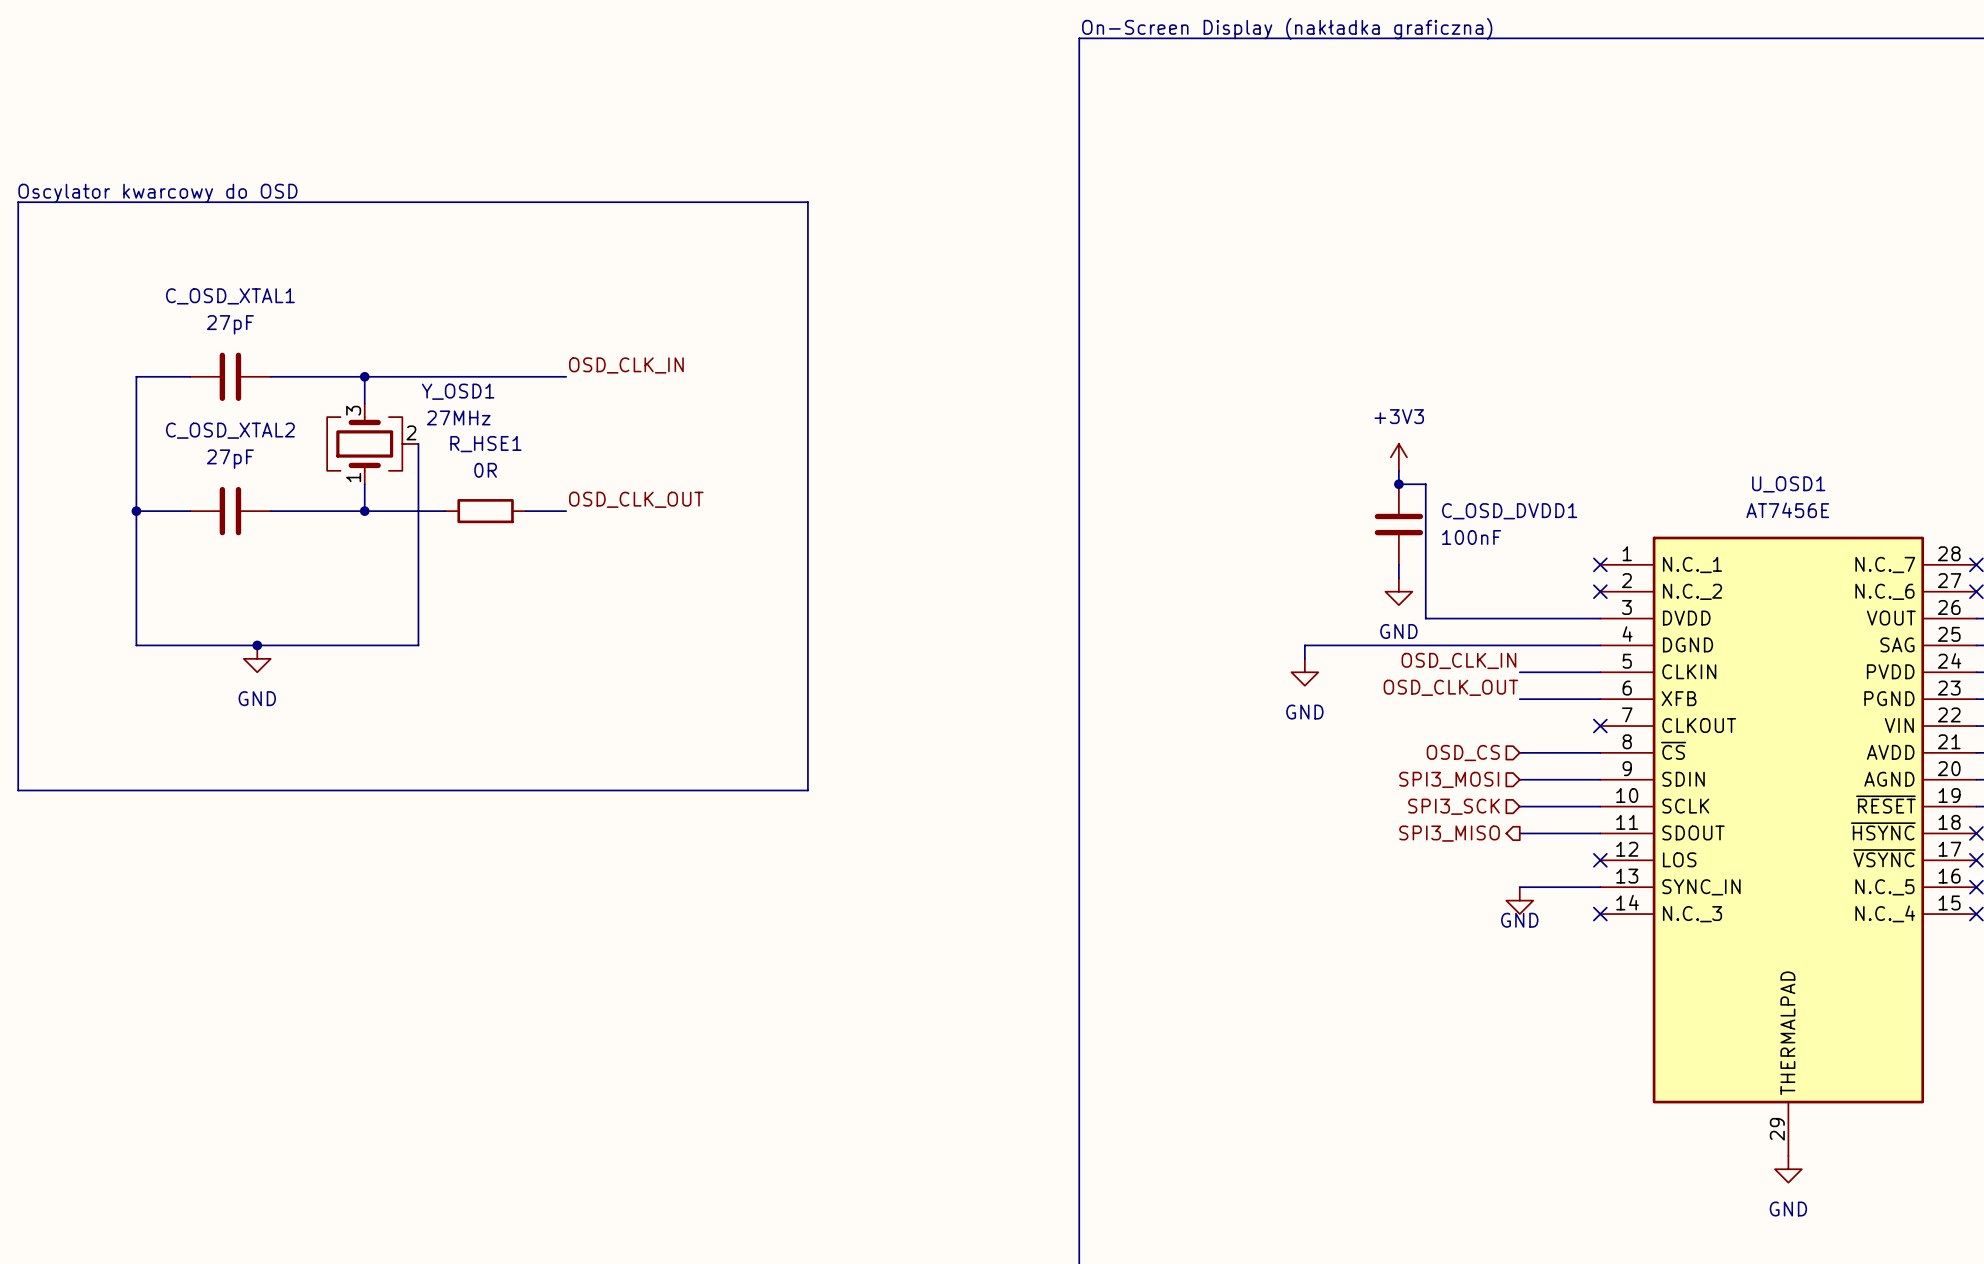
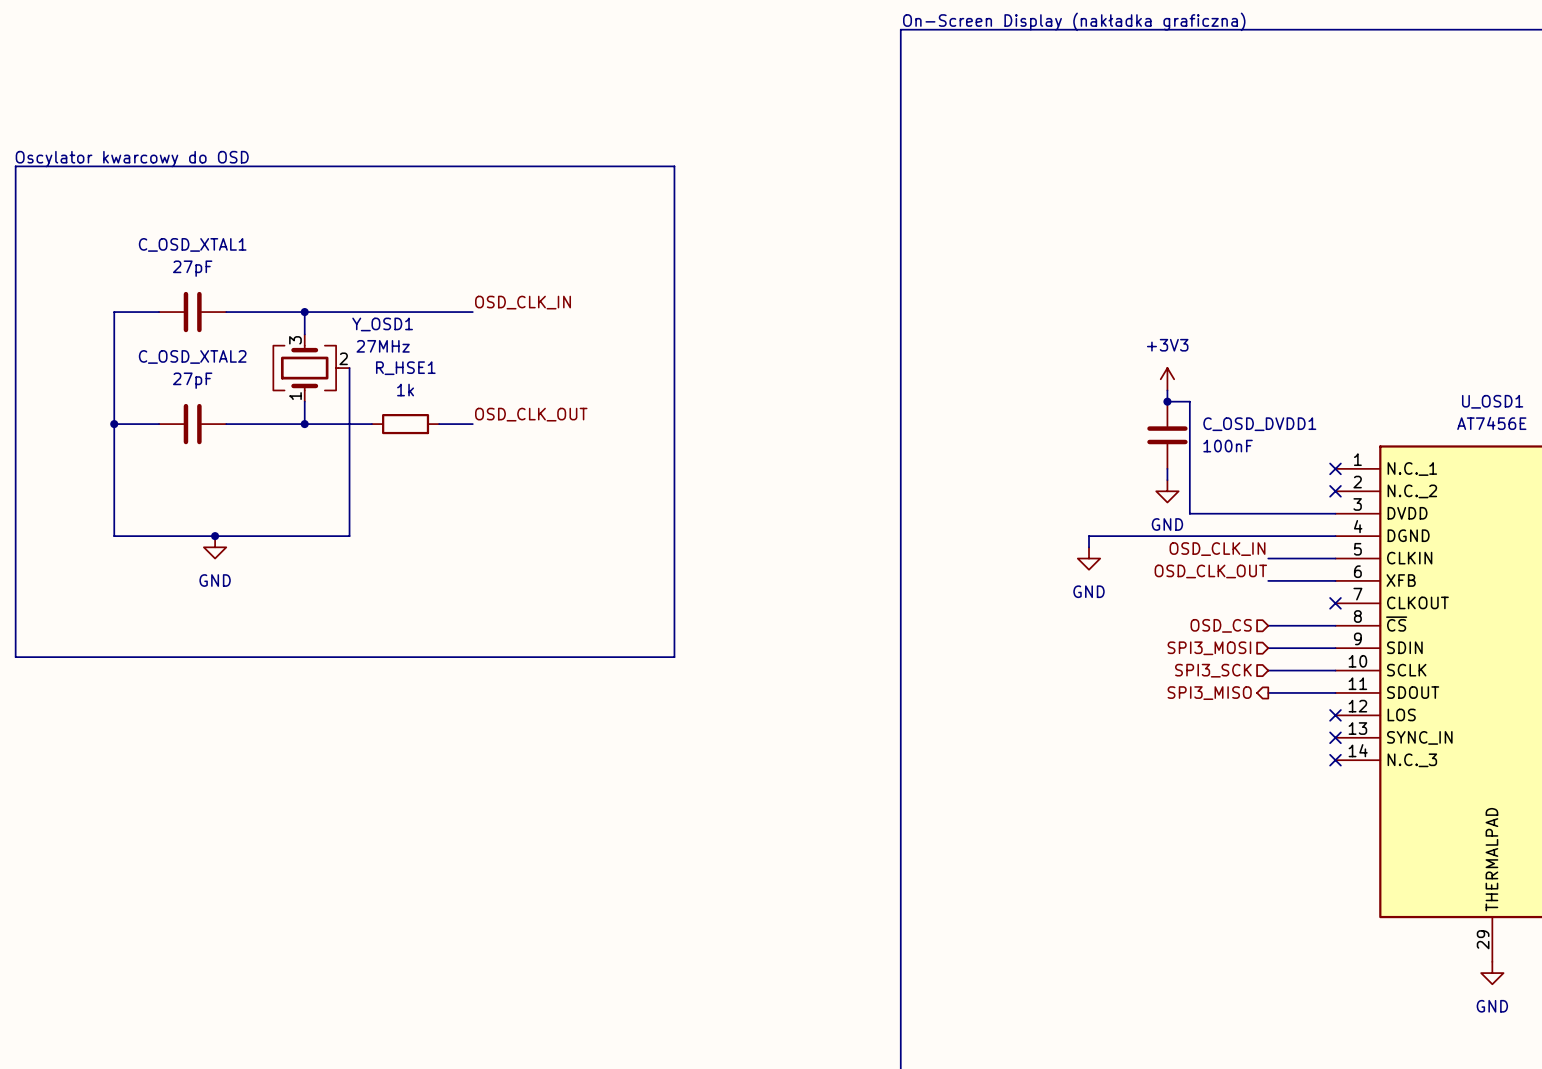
R_HSE1 value: 0R (485, 470) -> 1k (405, 390)
wire: (1519, 887) (1600, 887) -> none
no-connect mark: none -> (1335, 737)
power symbol: GND (1519, 900) -> none

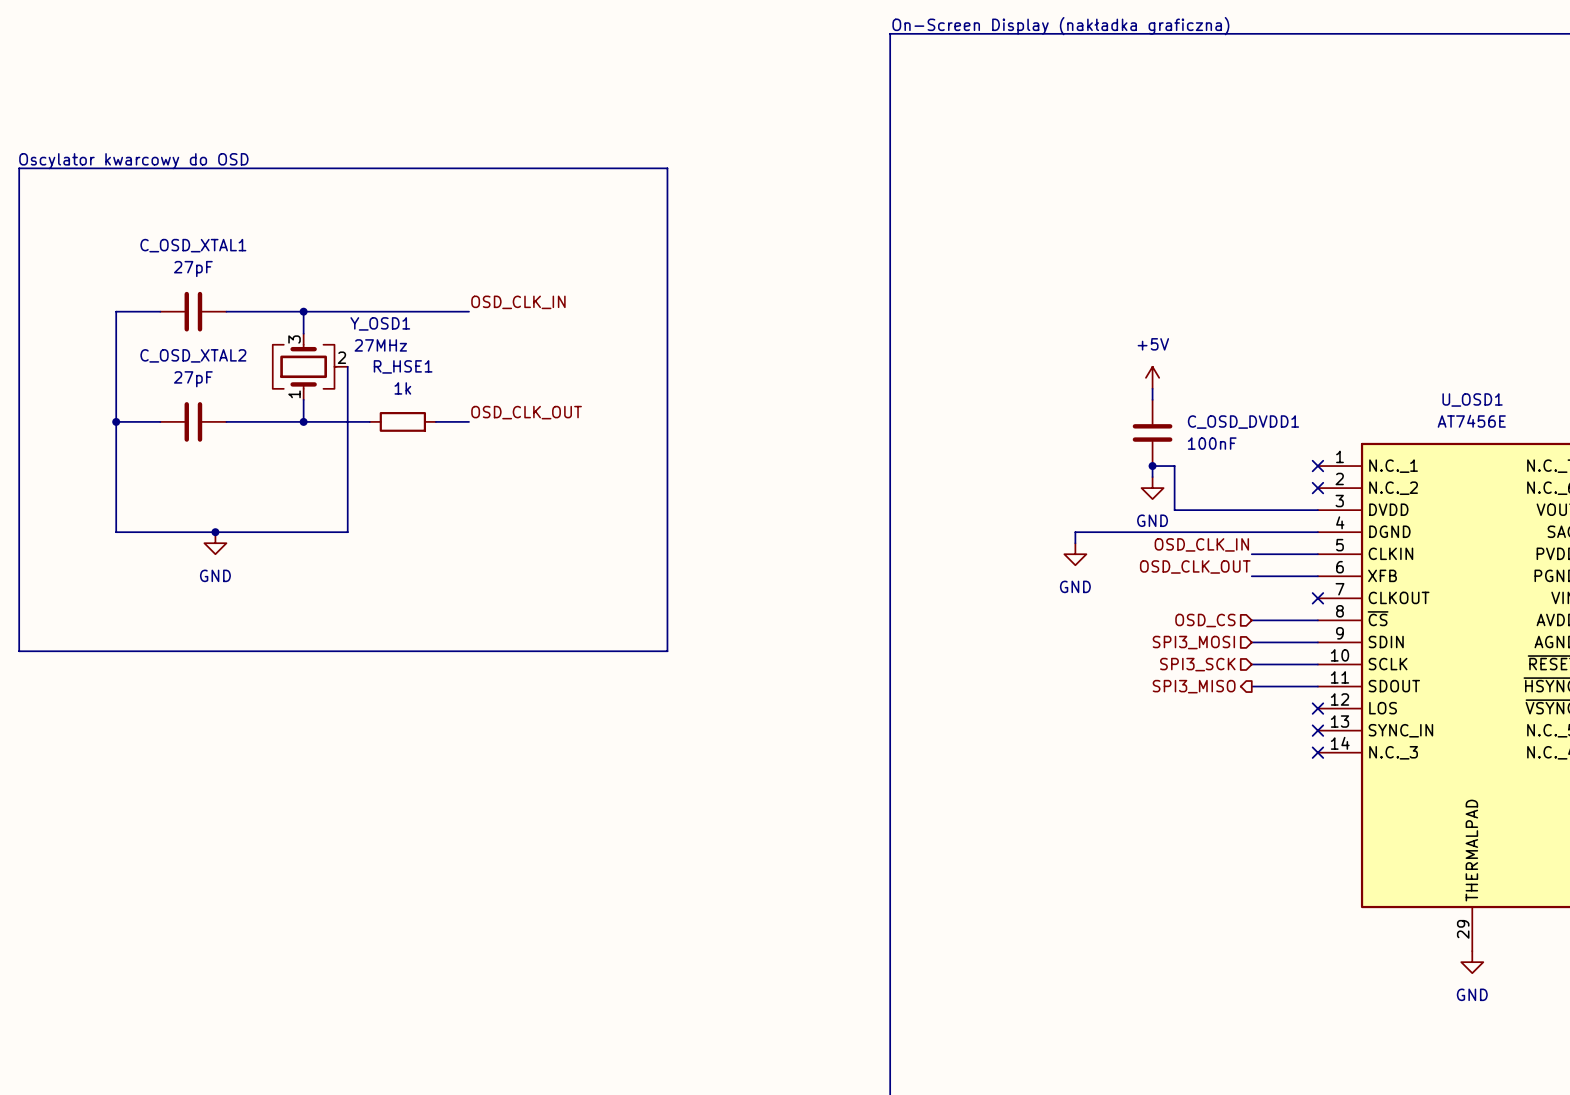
power symbol: +3V3 (1167, 379) -> +5V (1152, 377)
wire: (1167, 401) (1189, 401) (1189, 468) -> (1152, 466) (1174, 466)
junction: (1167, 401) -> none
junction: none -> (1152, 466)

